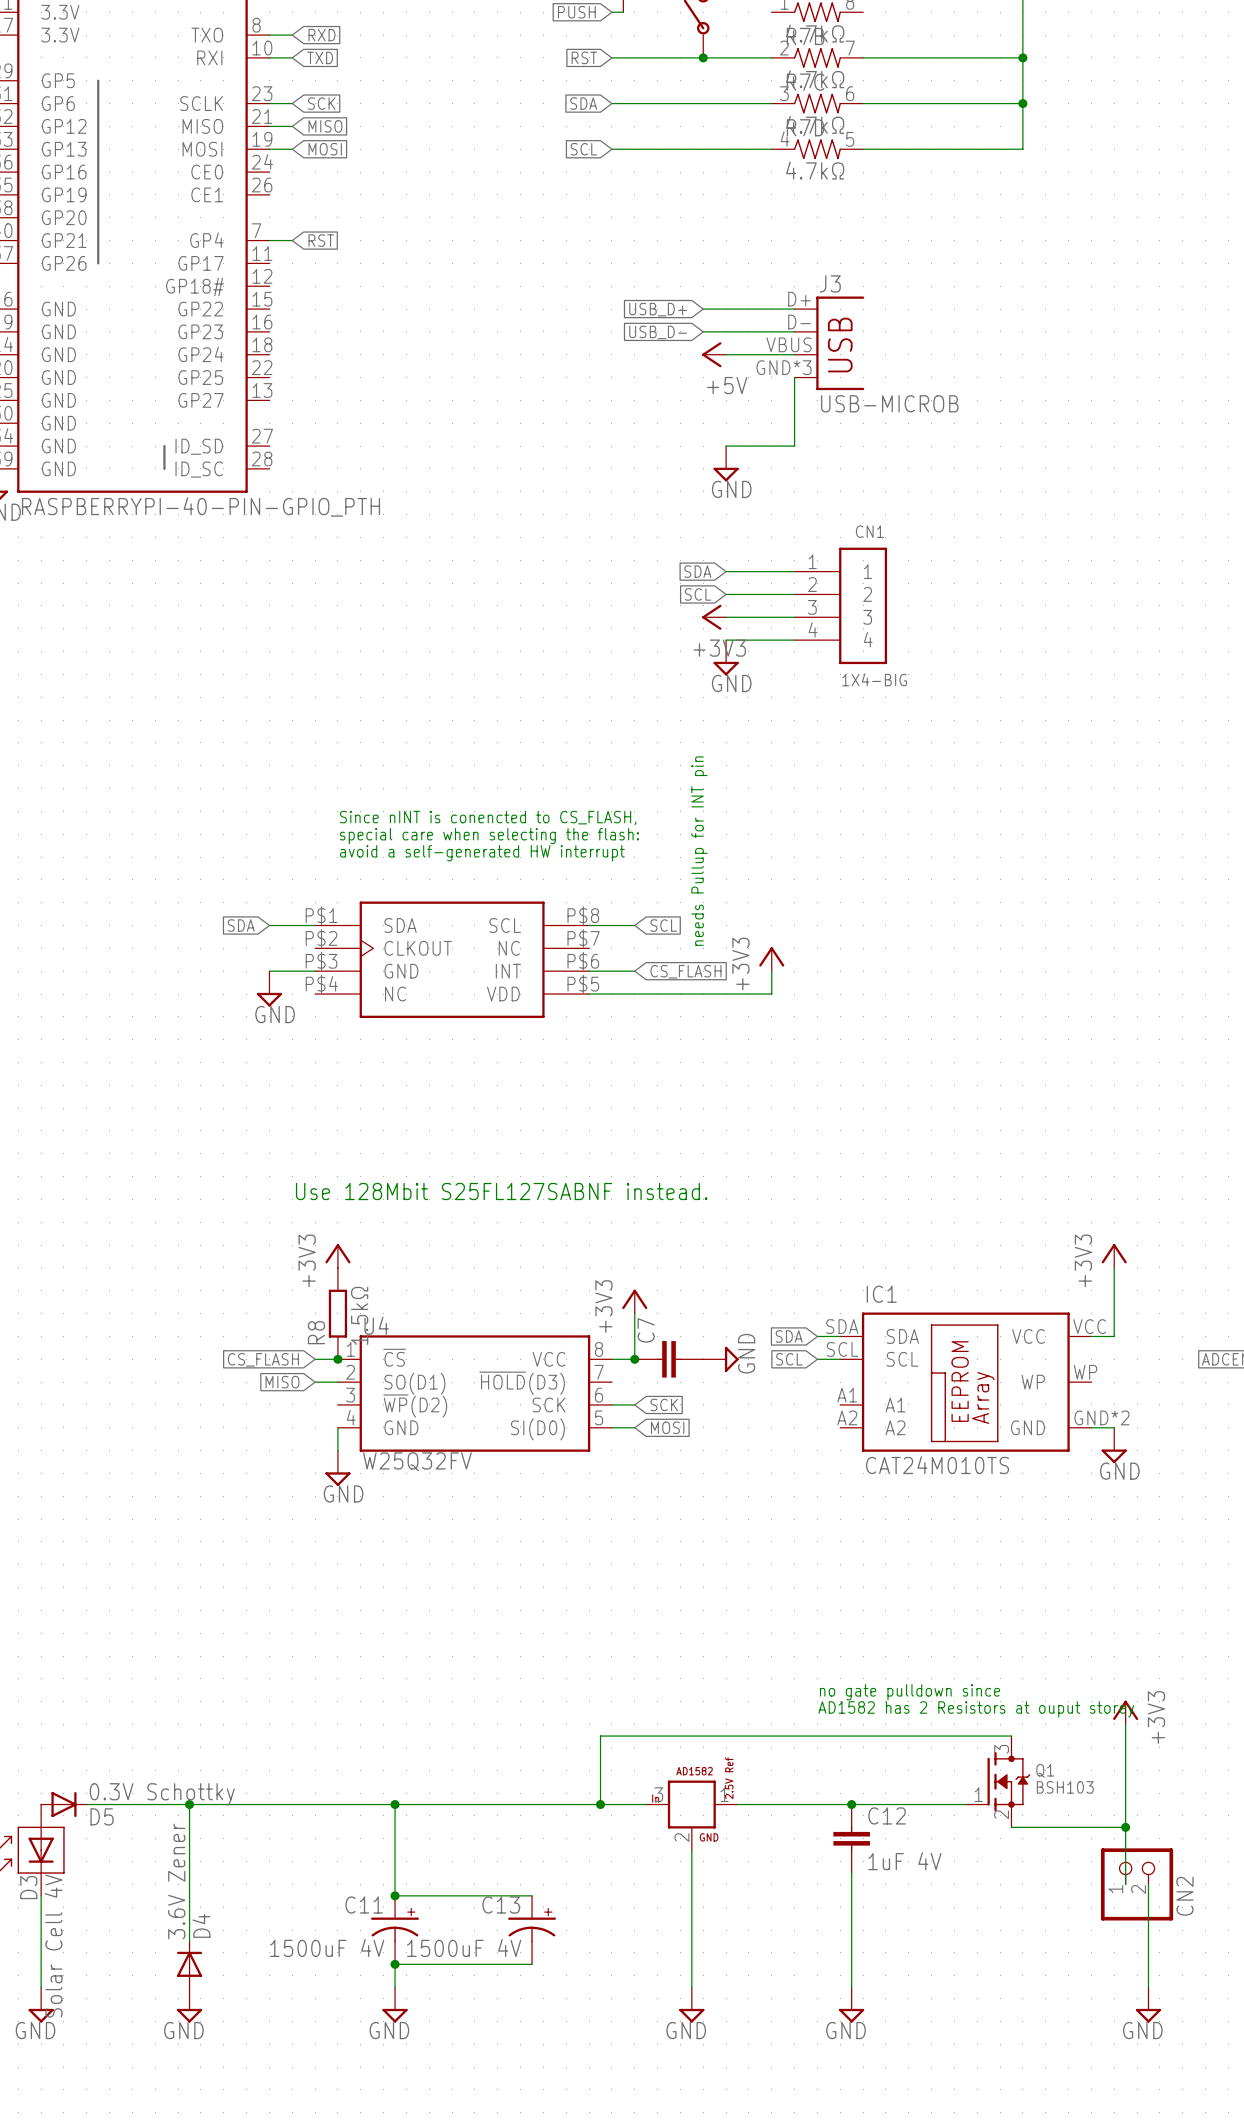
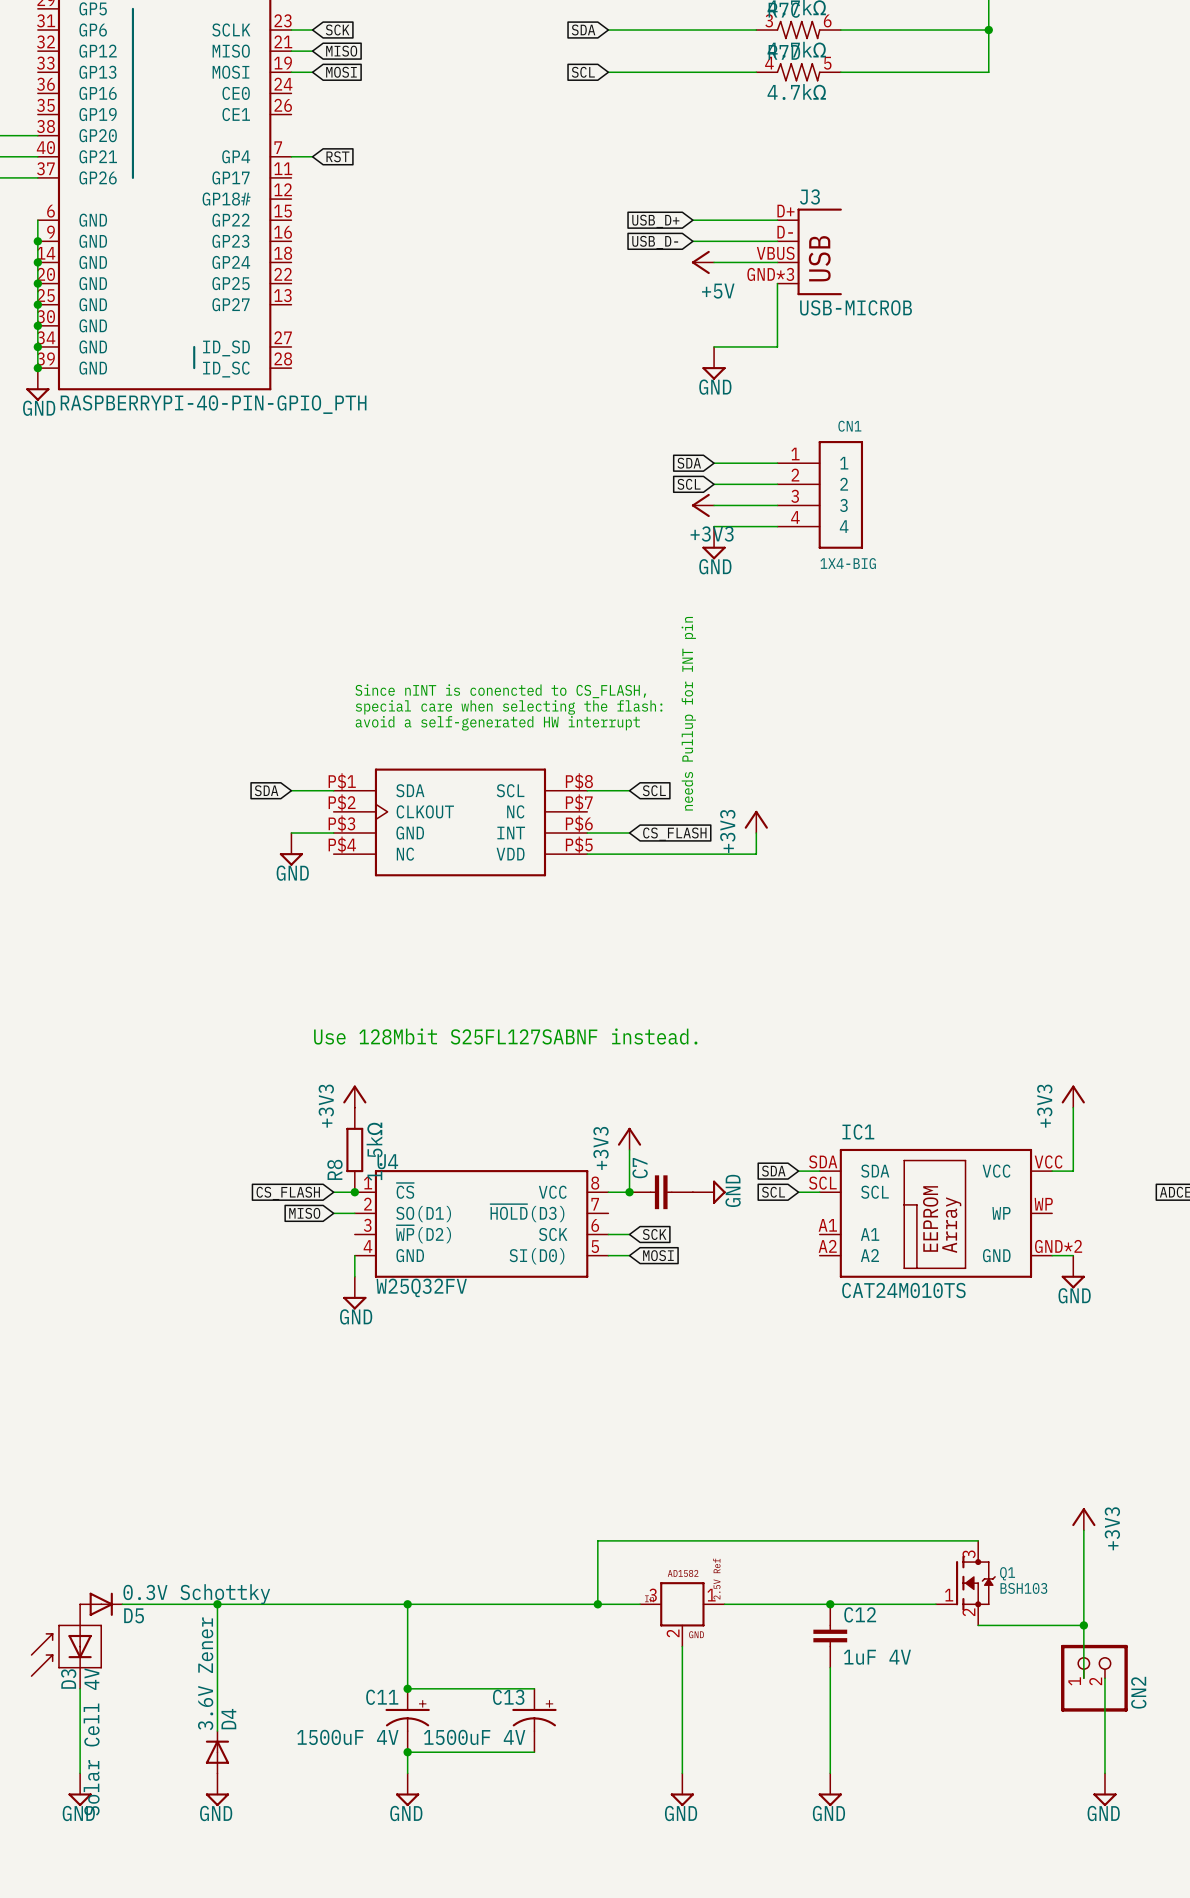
text: no gate pulldown since (909, 1692) -> none
text: AD1582 has 2 Resistors at ouput storey (976, 1709) -> none

